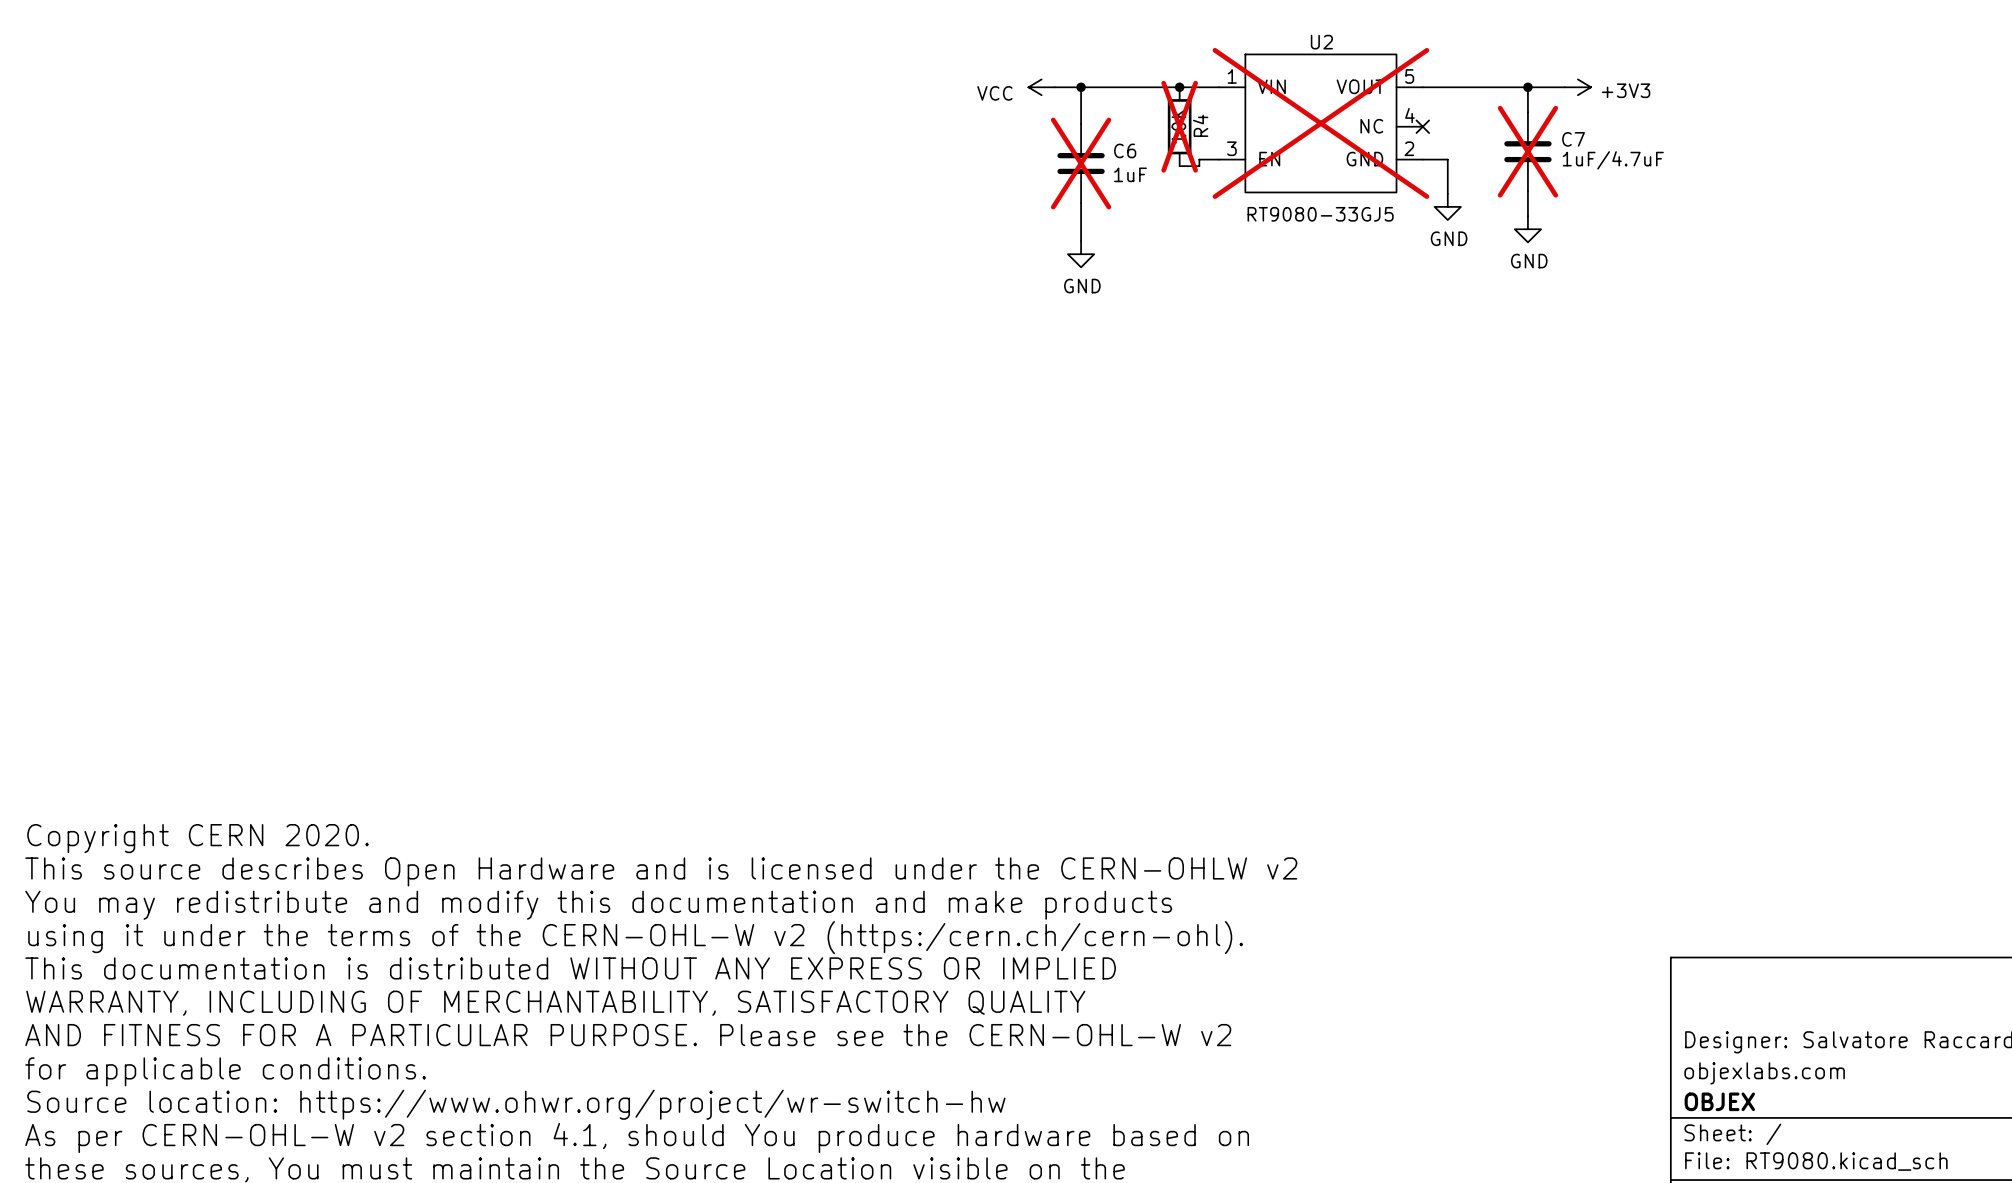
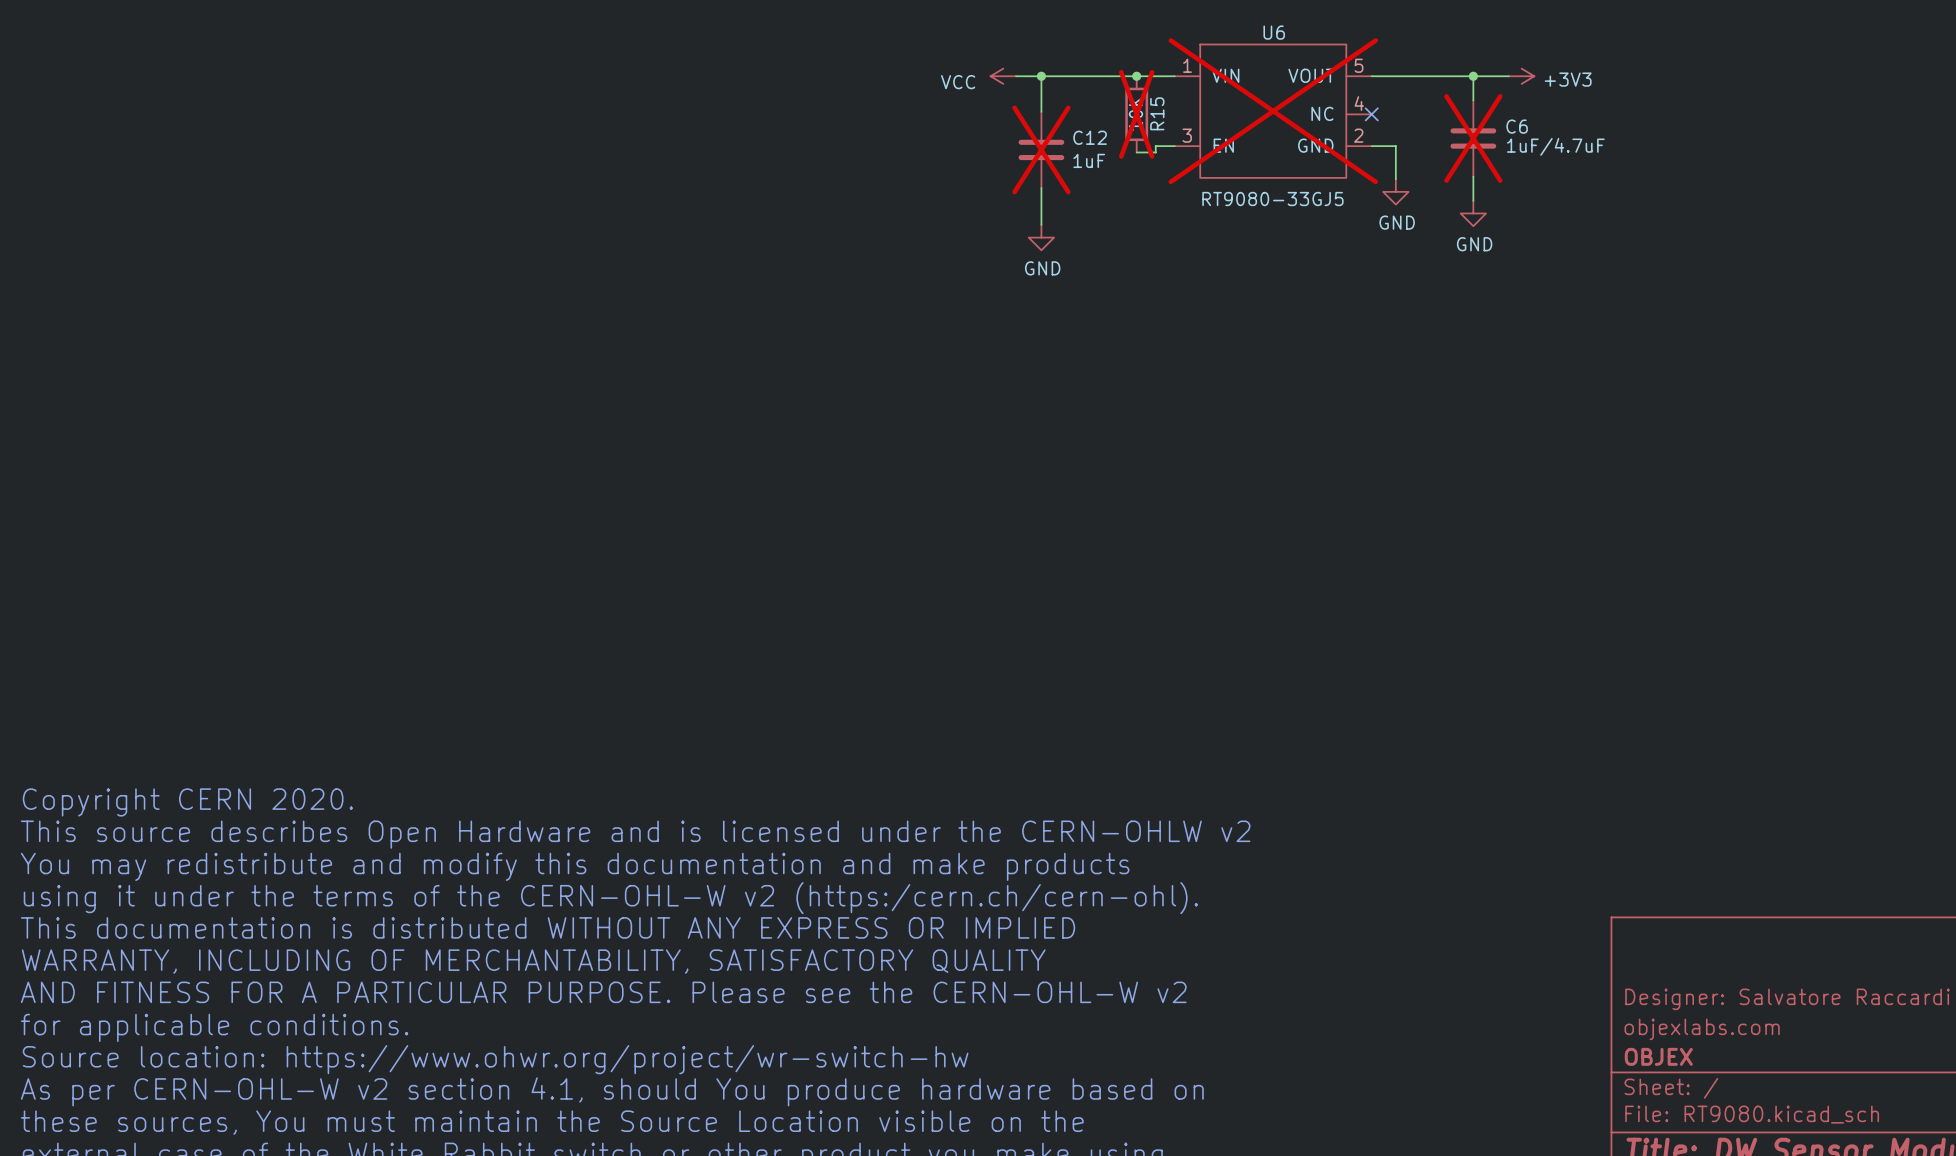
U2 name: U2 (1321, 42) -> U6 (1274, 32)
R4 name: R4 (1200, 125) -> R15 (1157, 113)
C7 name: C7 (1573, 139) -> C6 (1517, 126)
C6 name: C6 (1125, 150) -> C12 (1090, 137)

